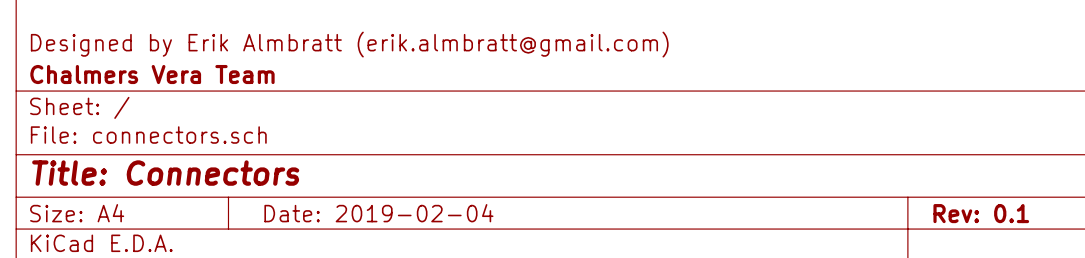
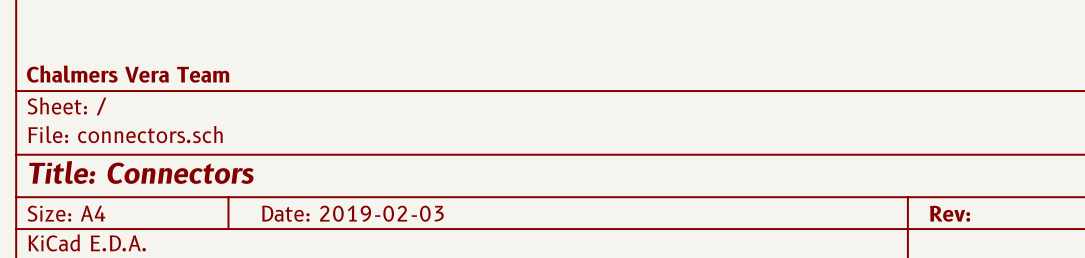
title block: Designed by Erik Almbratt (erik.almbratt@gmail.com) (349, 44) -> none
title block: Date: 2019-02-04 (378, 213) -> Date: 2019-02-03 (352, 213)
title block: Rev: 0.1 (981, 213) -> Rev: (950, 213)

